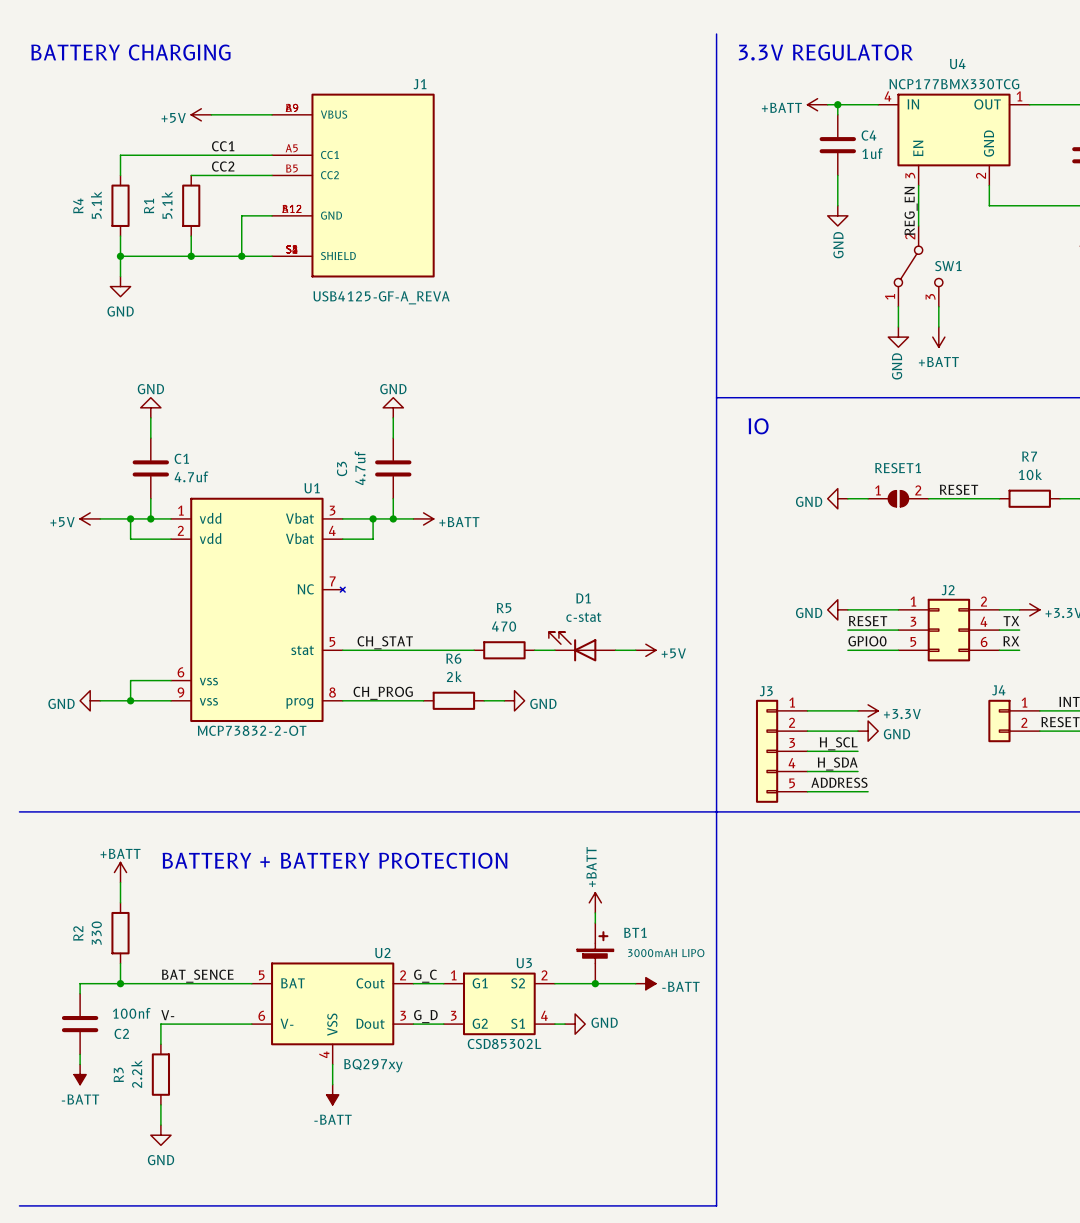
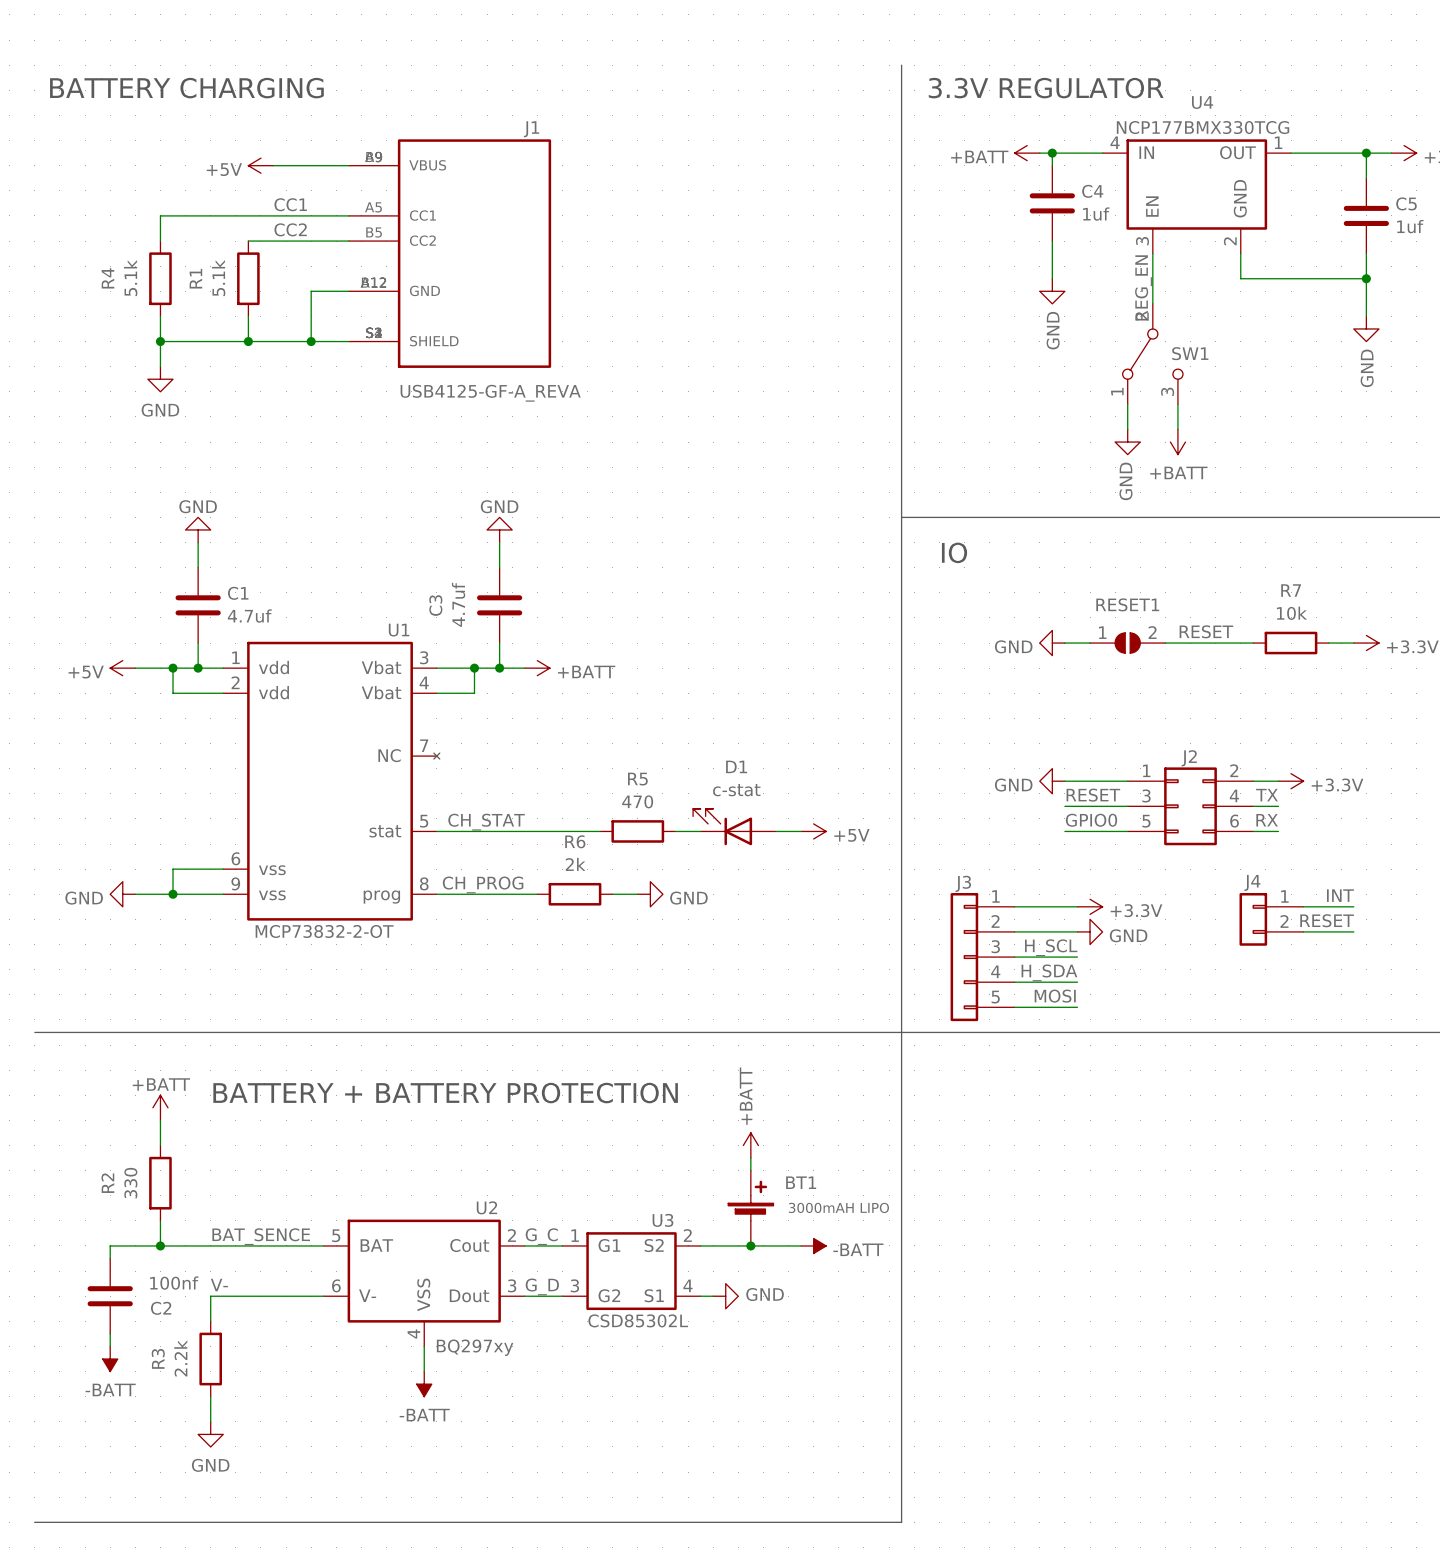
label: ADDRESS (839, 782) -> none
label: none -> MOSI (1055, 996)
wire: (858, 791) (868, 791) -> none

